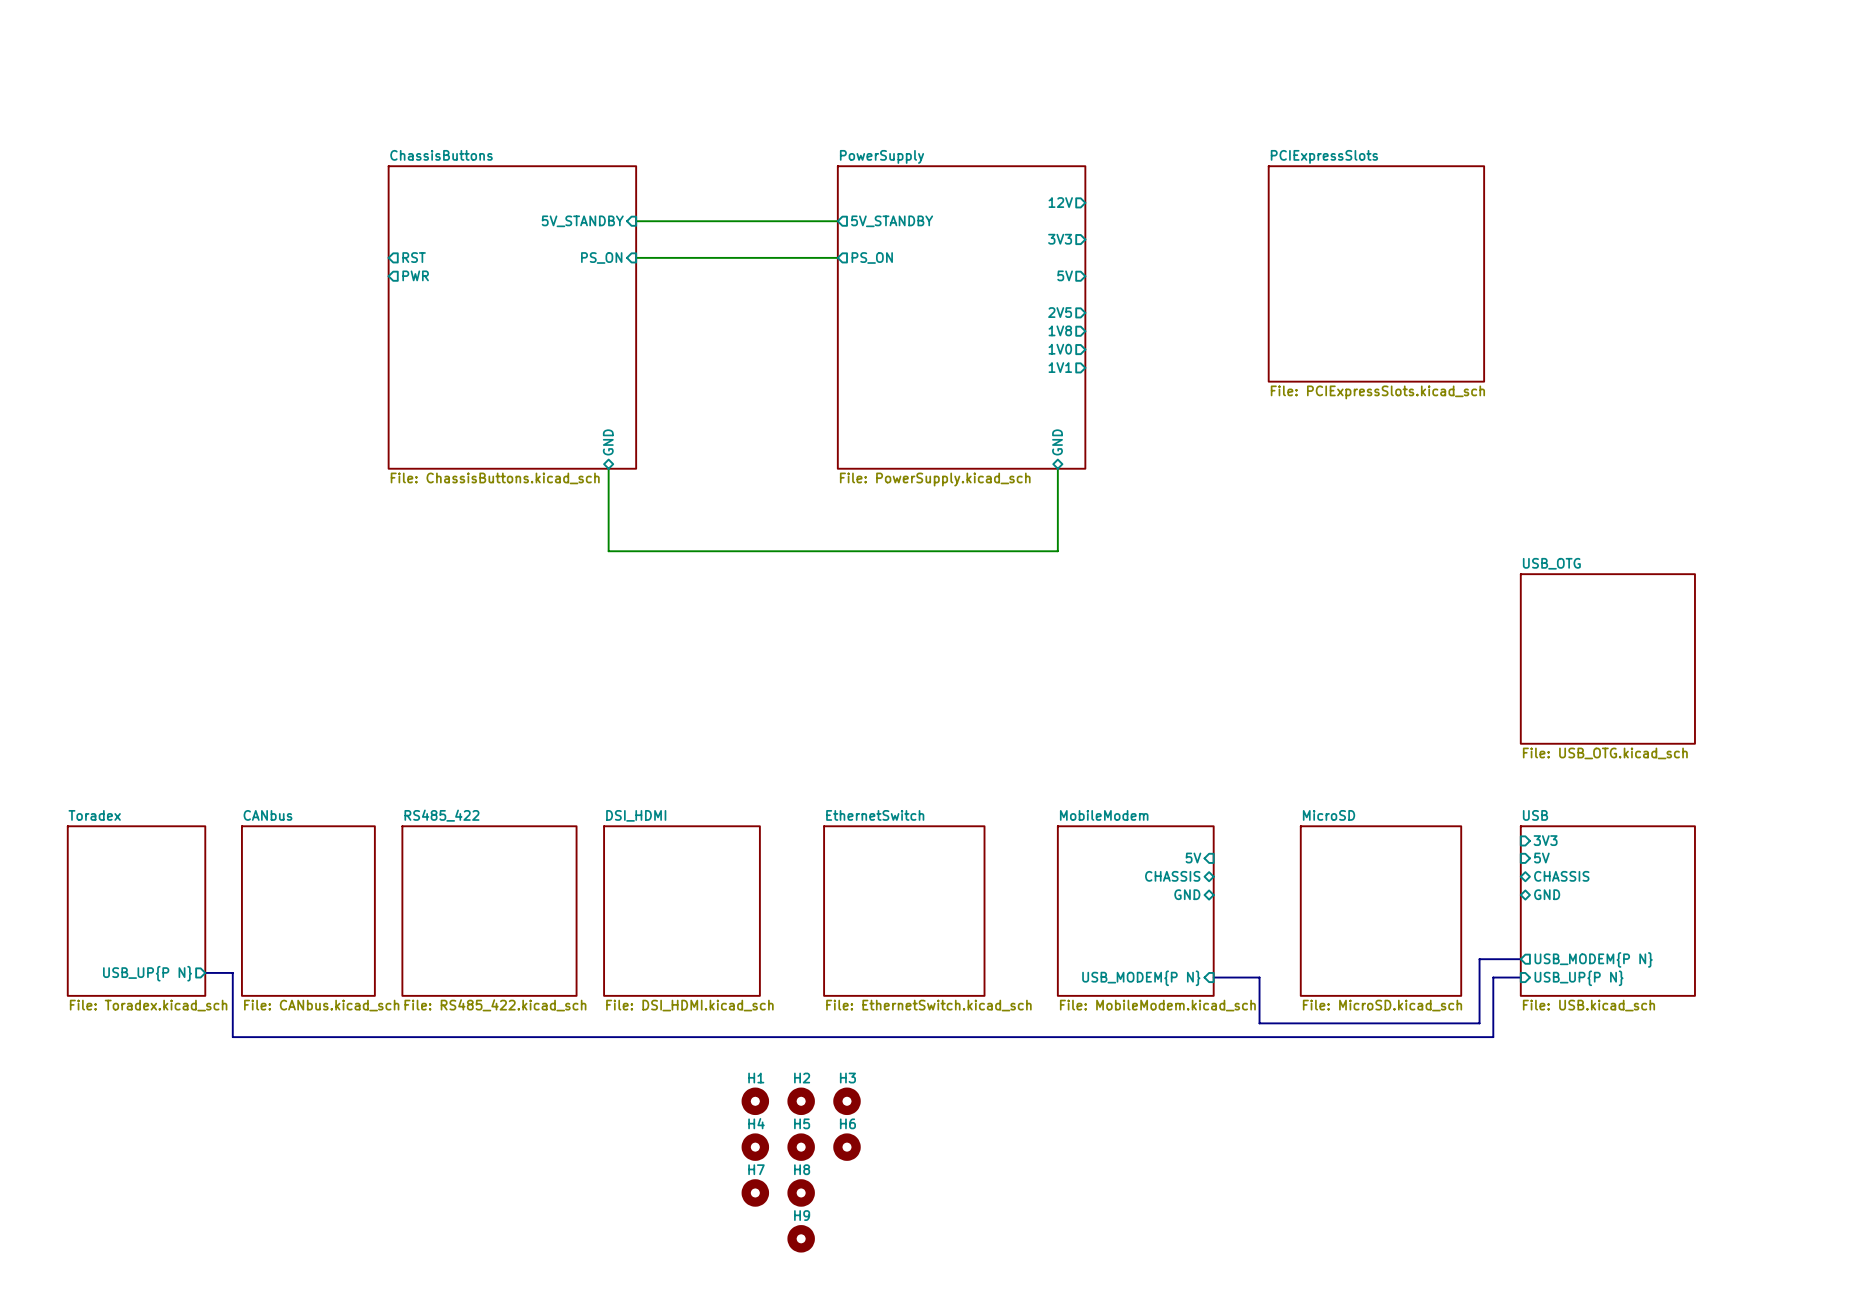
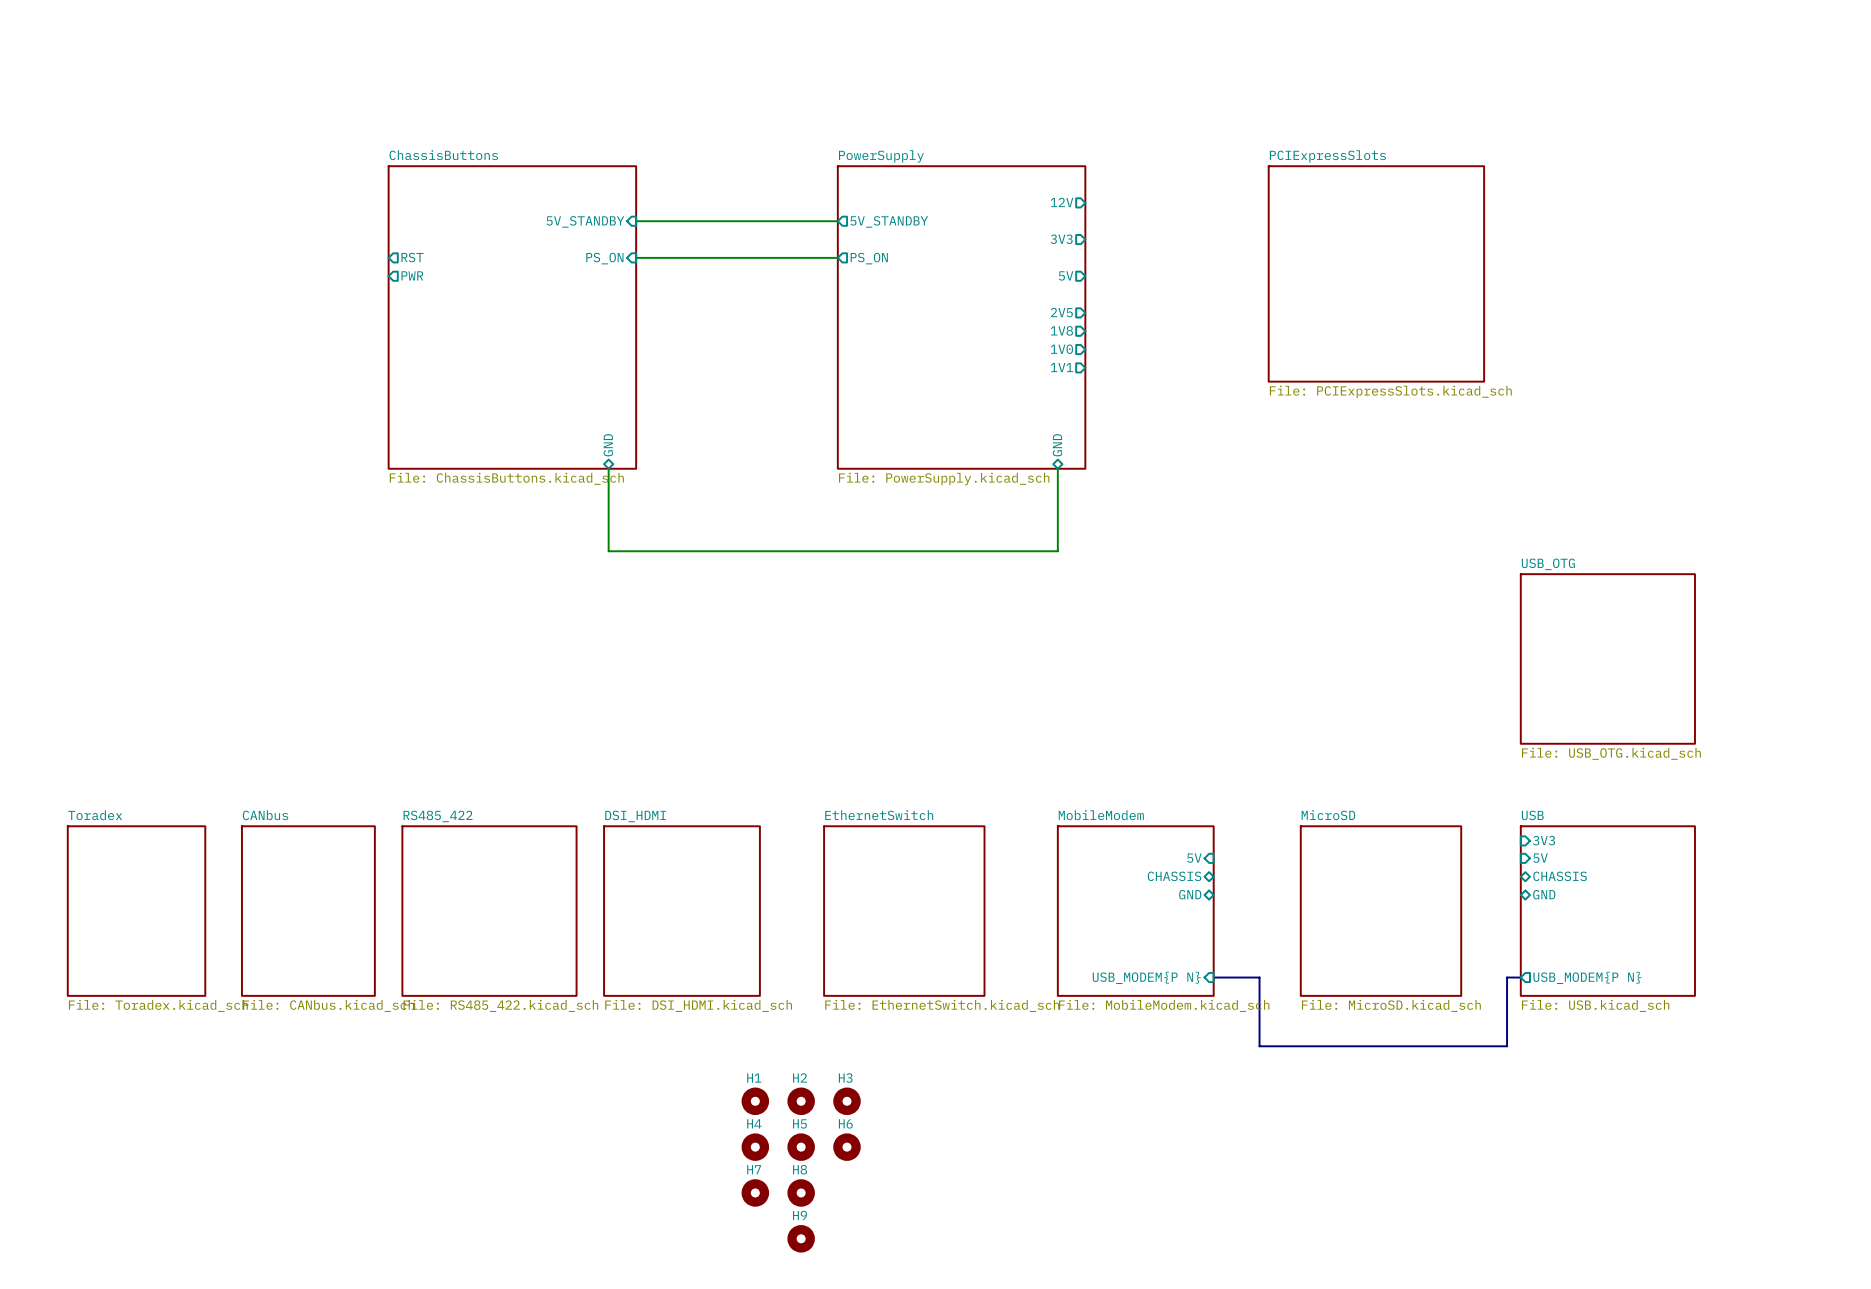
bus: (1520, 959) (1479, 959) (1479, 1023) (1259, 1023) -> (1507, 977) (1507, 1046) (1259, 1046) (1259, 1023)
sheet pin: USB_MODEM{P N} (1593, 959) -> none
bus: (205, 972) (232, 972) (232, 1037) (1493, 1037) (1493, 977) (1507, 977) -> none
sheet pin: USB_UP{P N} (147, 973) -> none
sheet pin shape: input (1579, 978) -> output (1587, 977)
sheet pin: USB_UP{P N} (1579, 978) -> USB_MODEM{P N} (1587, 977)

